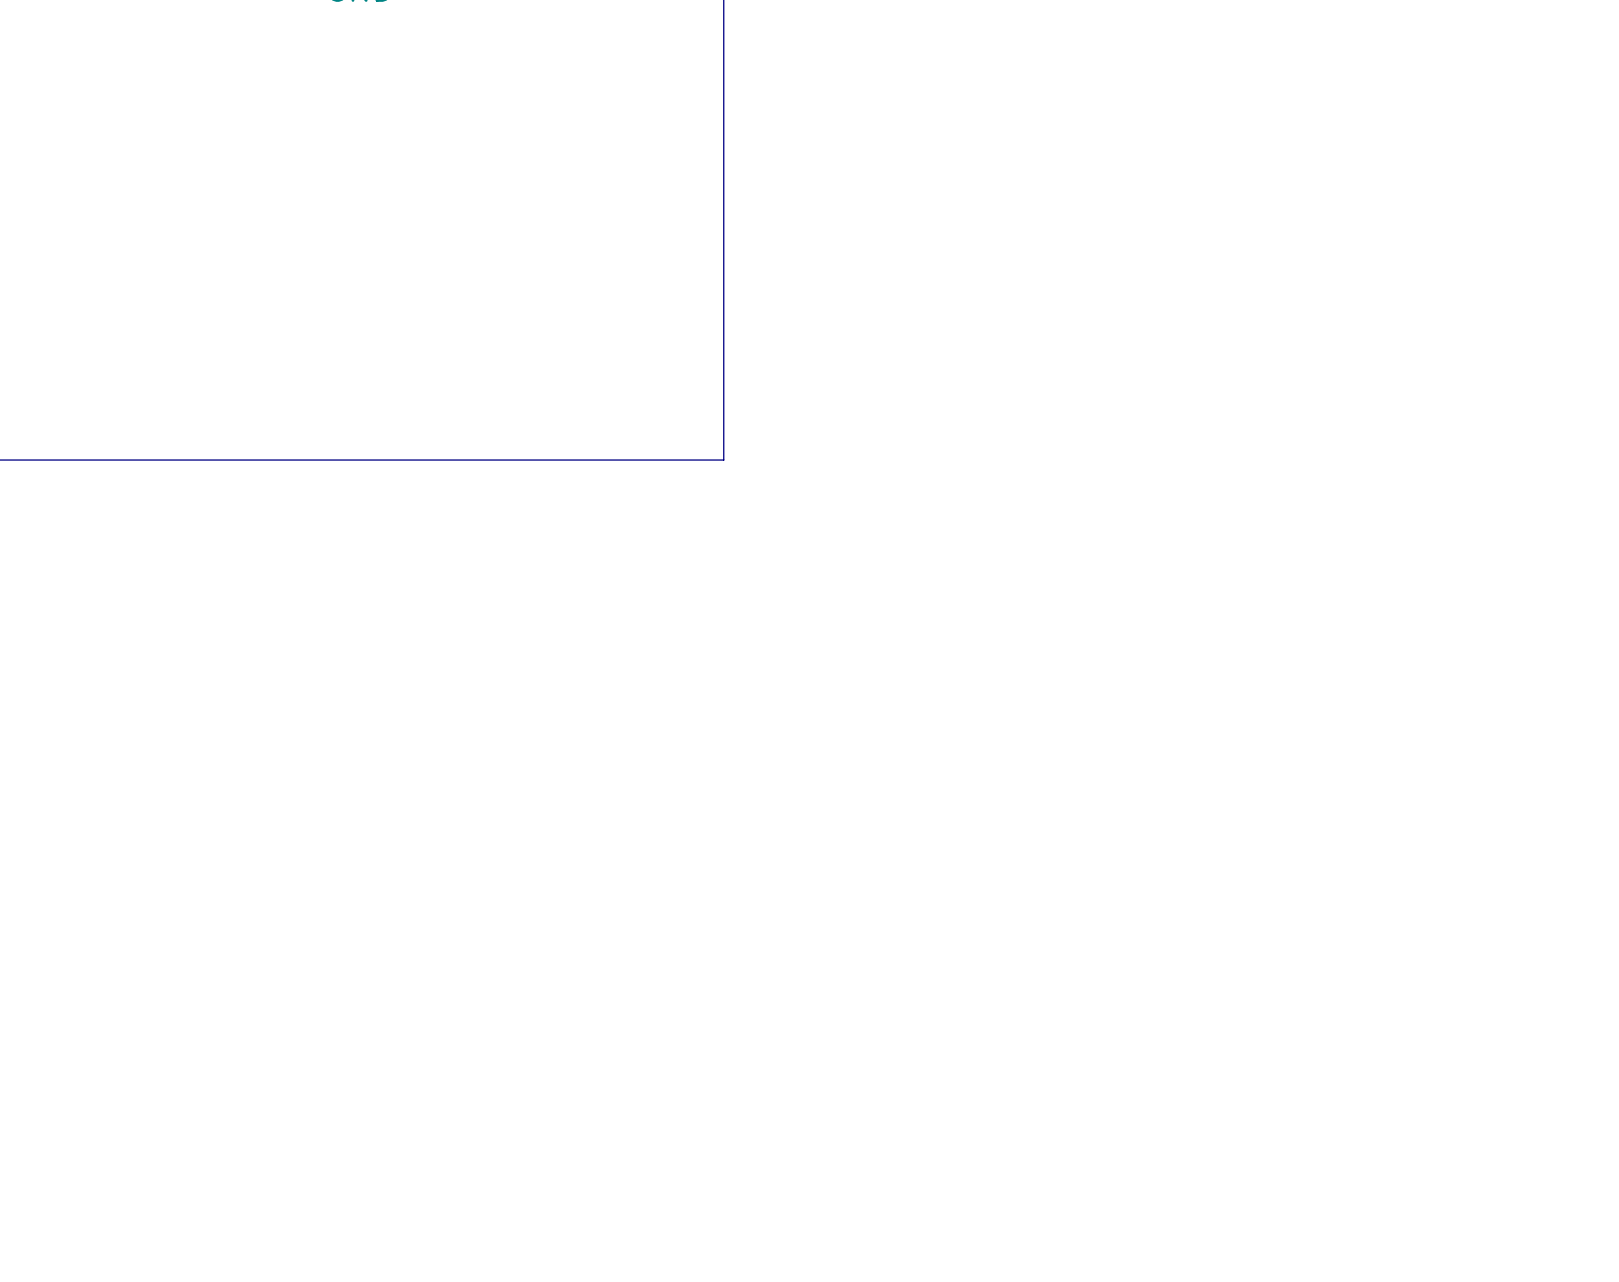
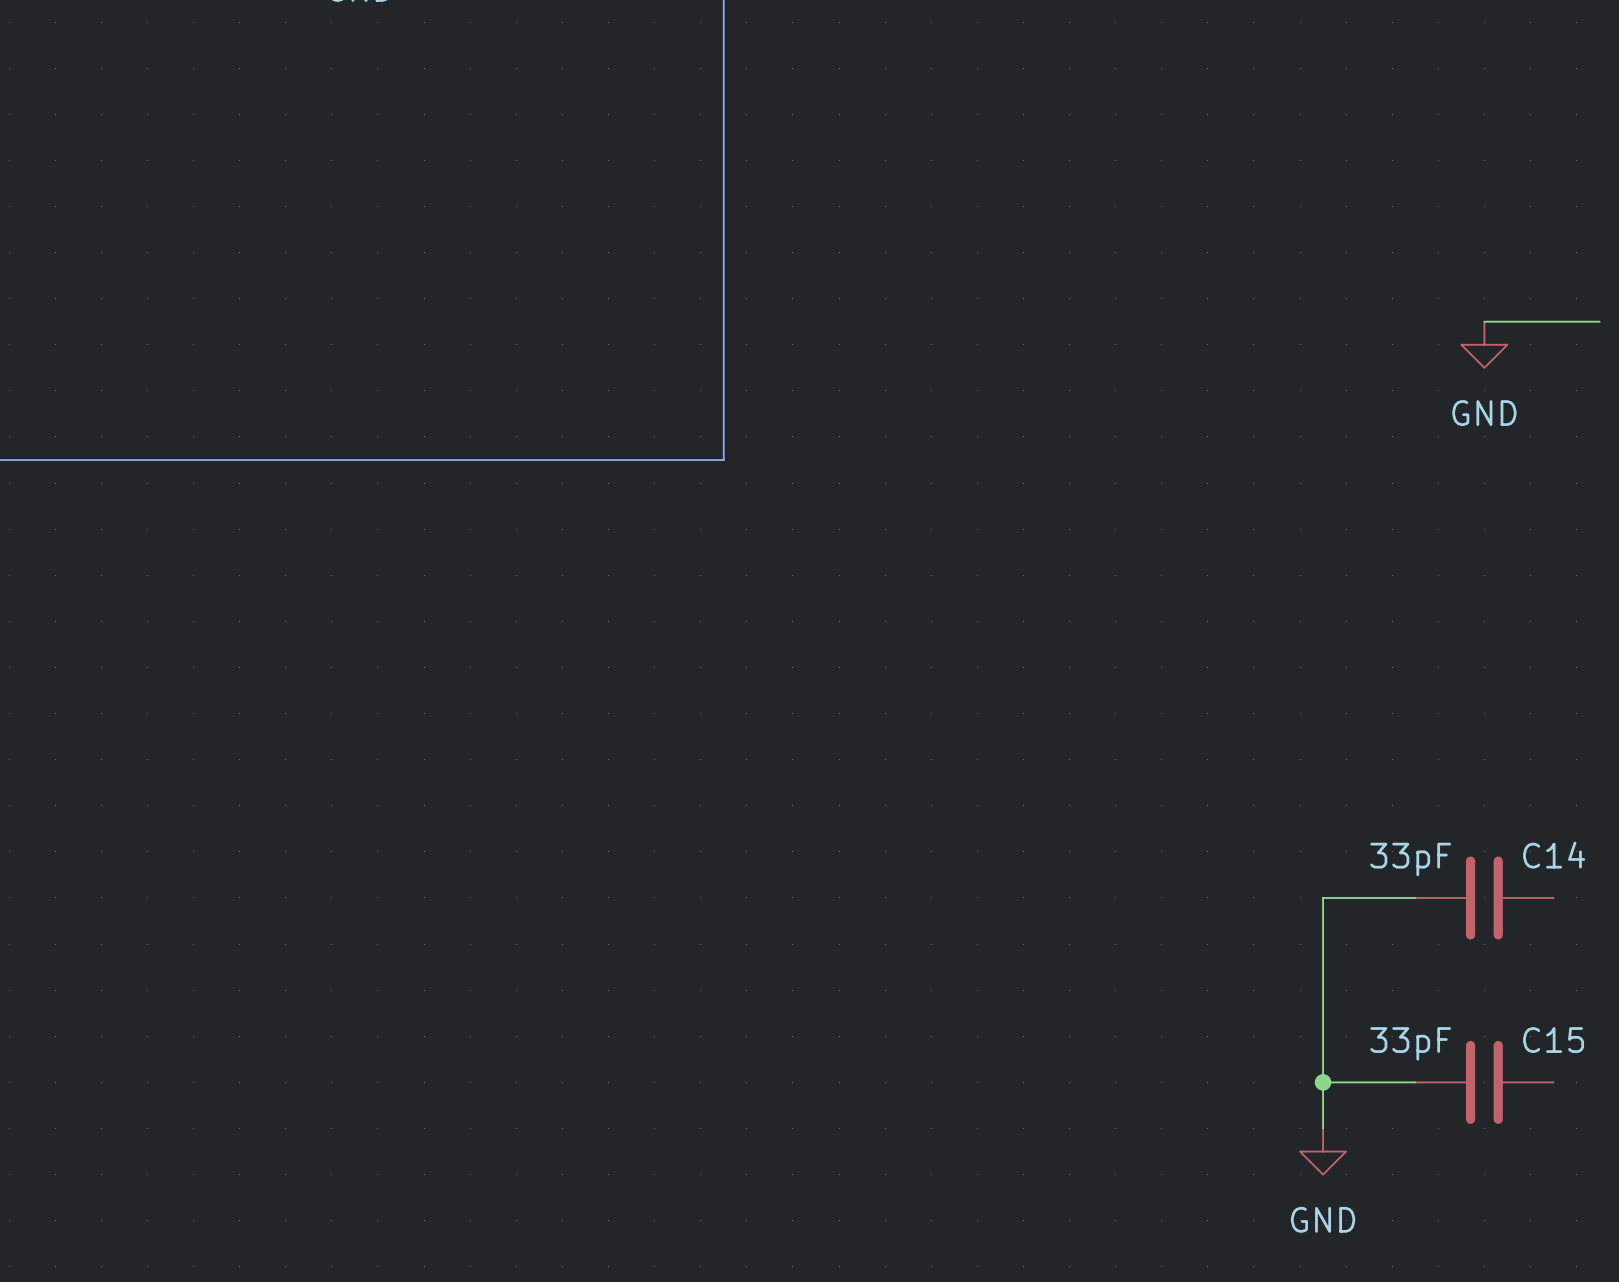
wire: none -> (1484, 321) (1599, 321)
power symbol: none -> GND (1484, 344)
wire: none -> (1415, 897) (1323, 897) (1323, 1128)
C14: none -> 33pF (1484, 897)
wire: none -> (1323, 1082) (1415, 1082)
junction: none -> (1323, 1082)
C15: none -> 33pF (1484, 1082)
power symbol: none -> GND (1323, 1151)

